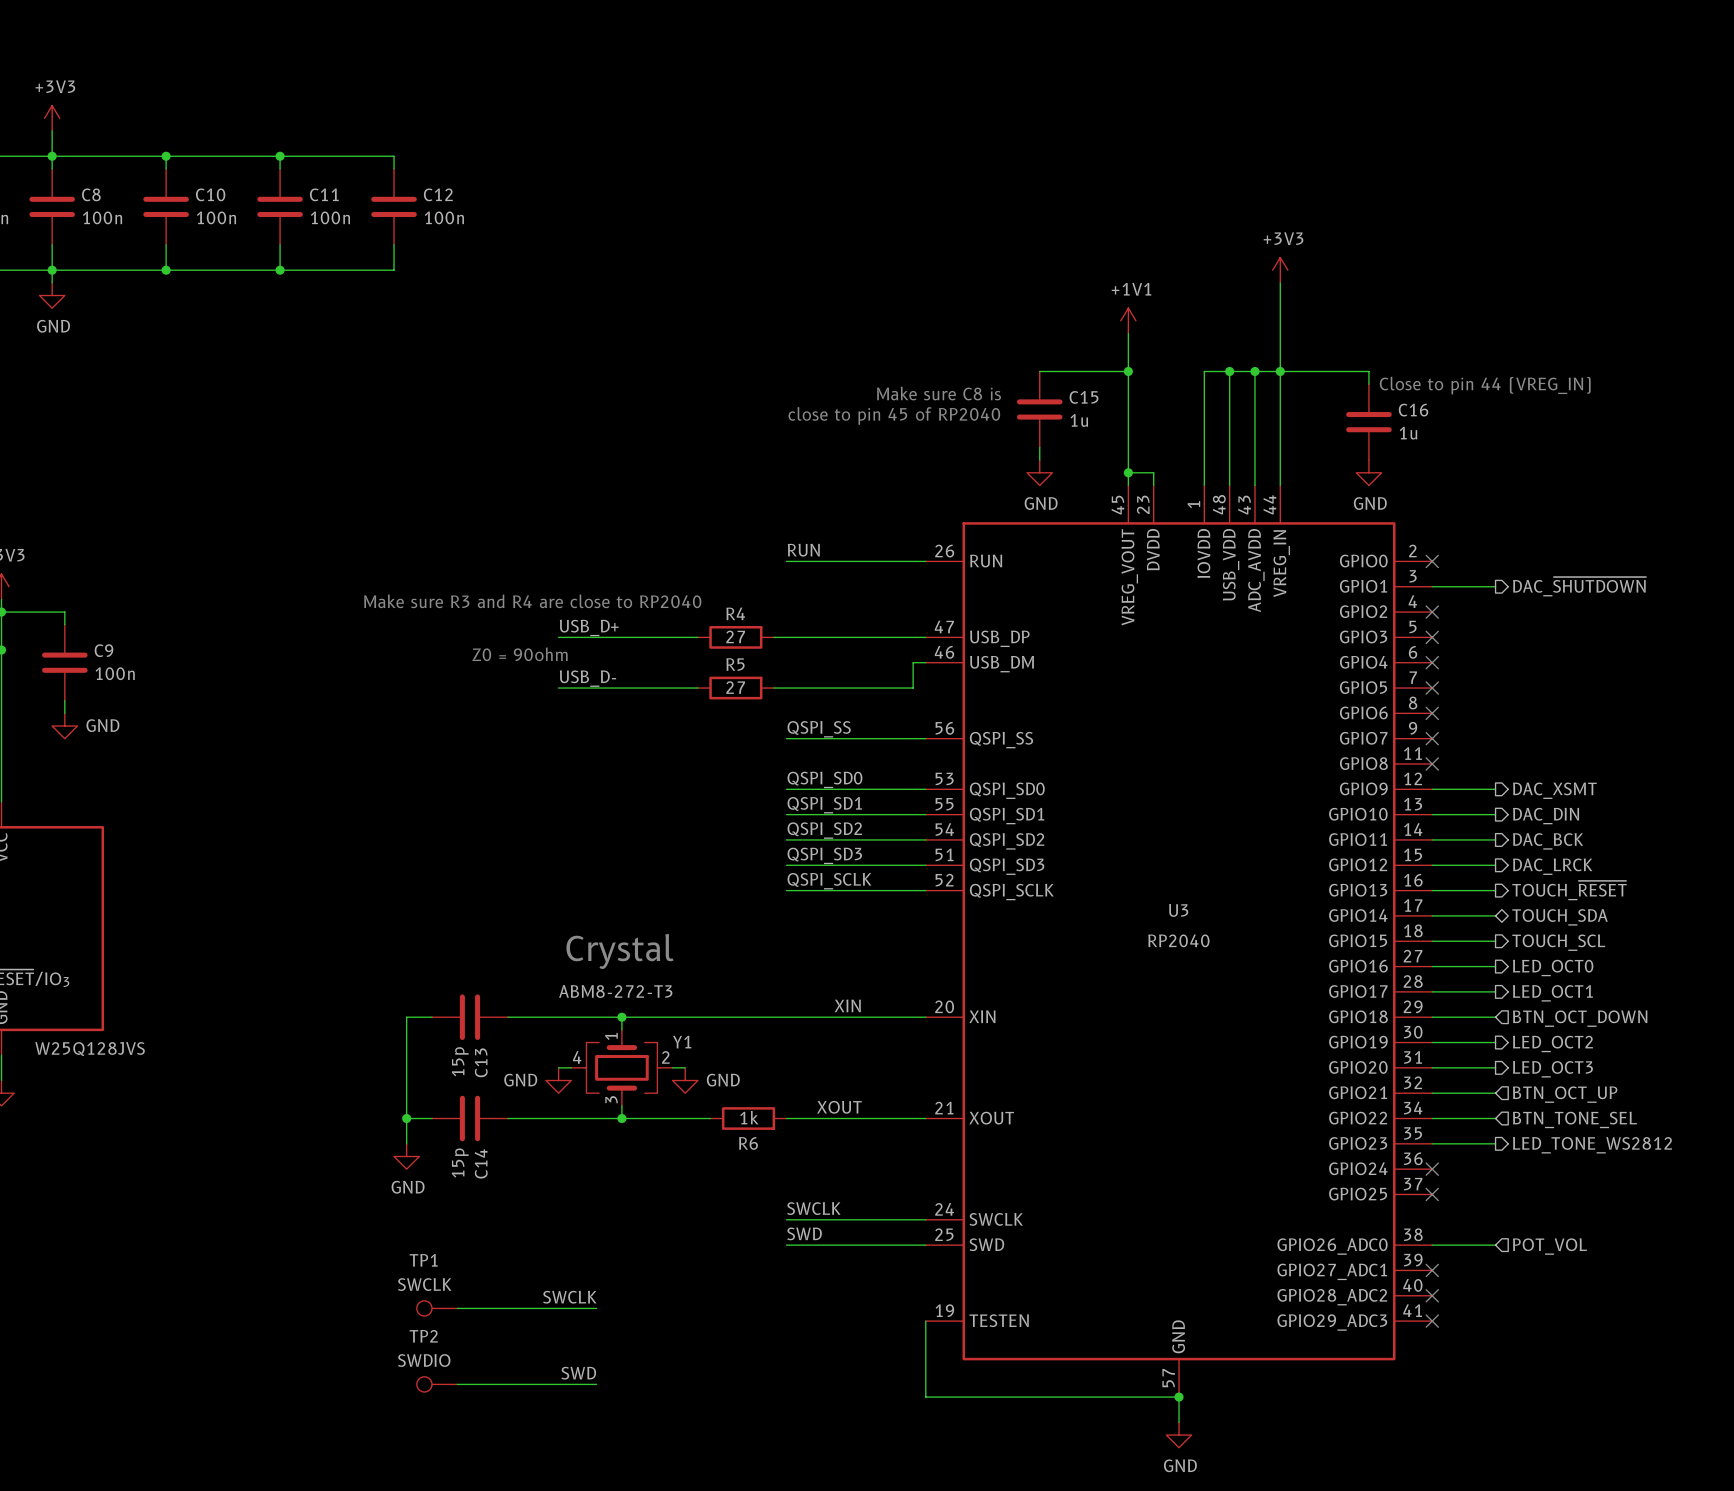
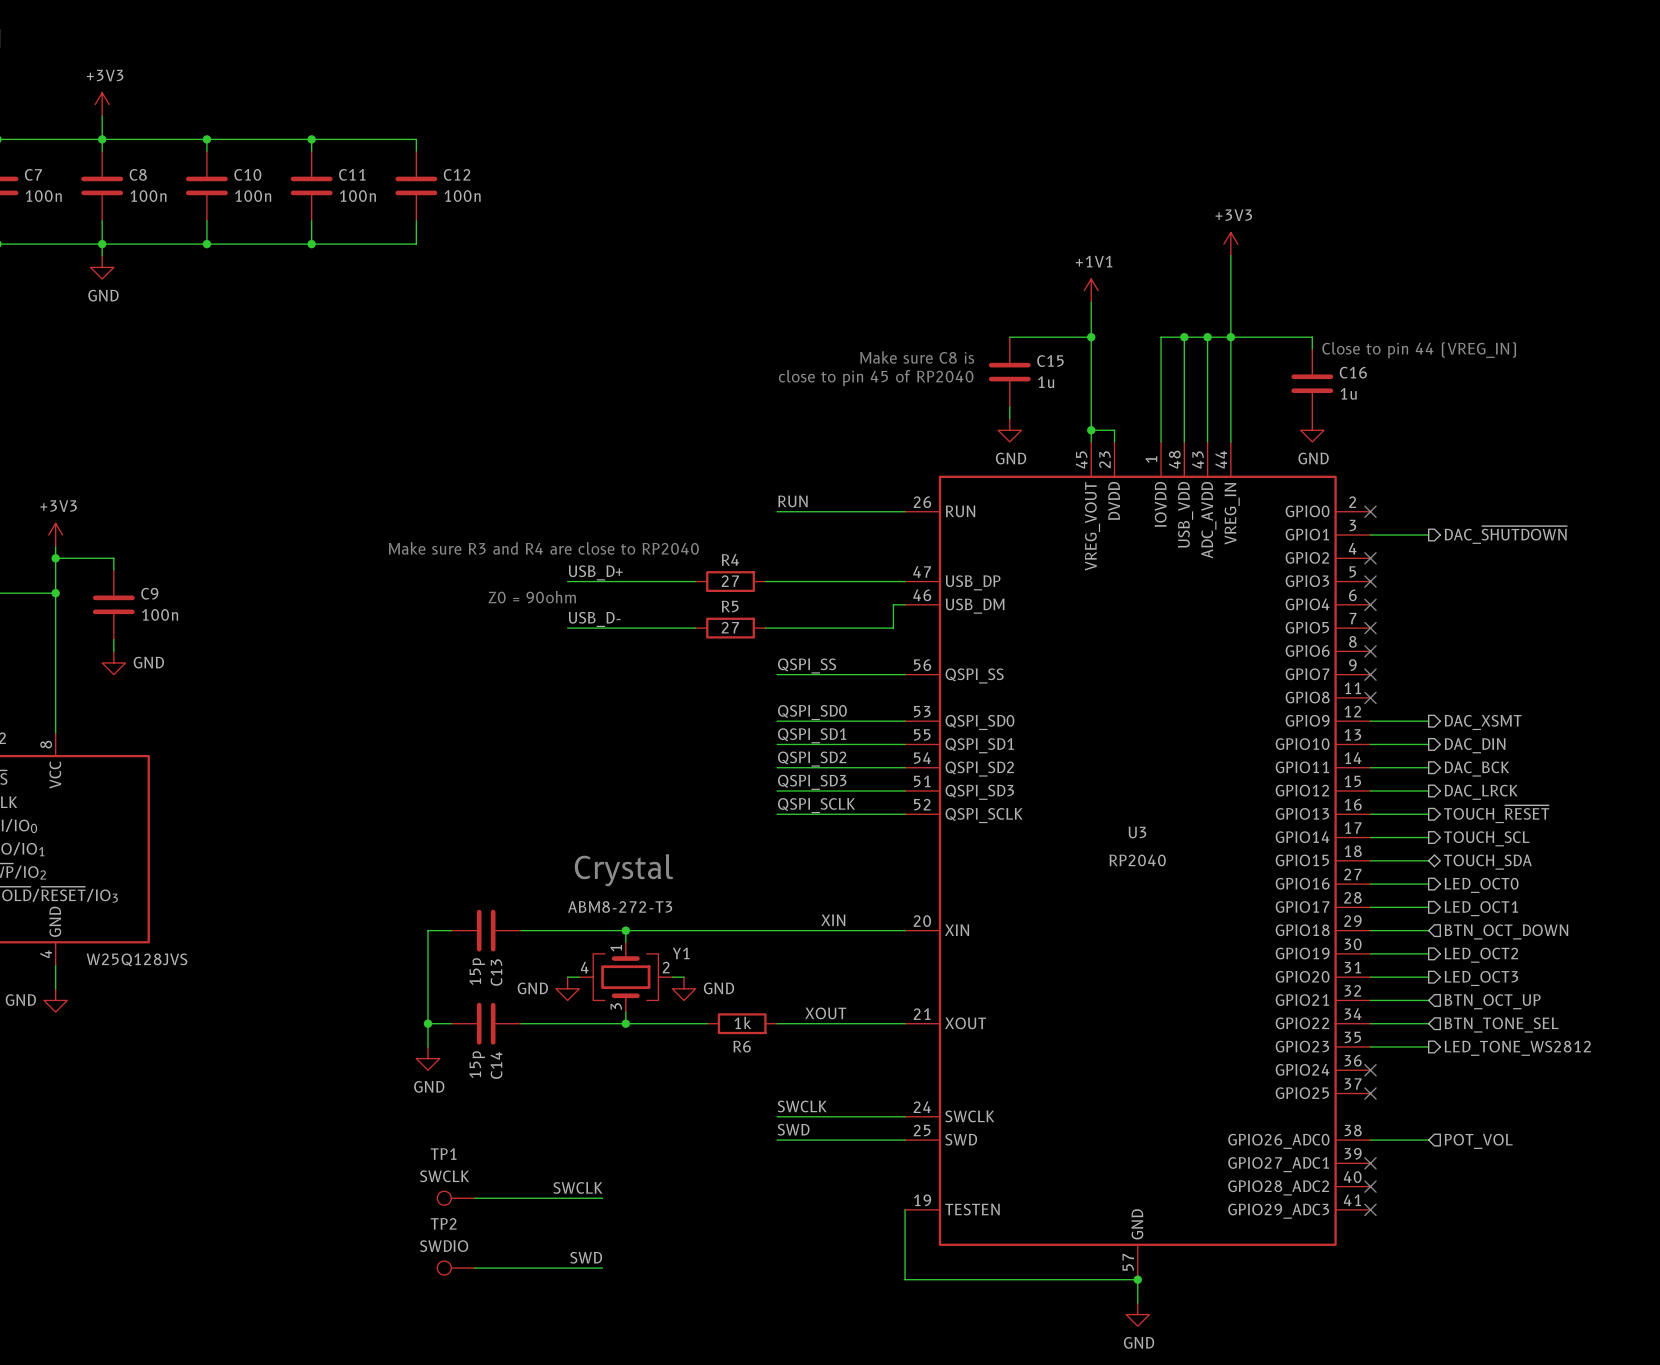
hierarchical label shape: bidirectional (1560, 917) -> output (1486, 838)
hierarchical label: TOUCH_SDA (1560, 917) -> TOUCH_SCL (1486, 838)
hierarchical label shape: output (1558, 942) -> bidirectional (1487, 862)
hierarchical label: TOUCH_SCL (1558, 942) -> TOUCH_SDA (1487, 862)

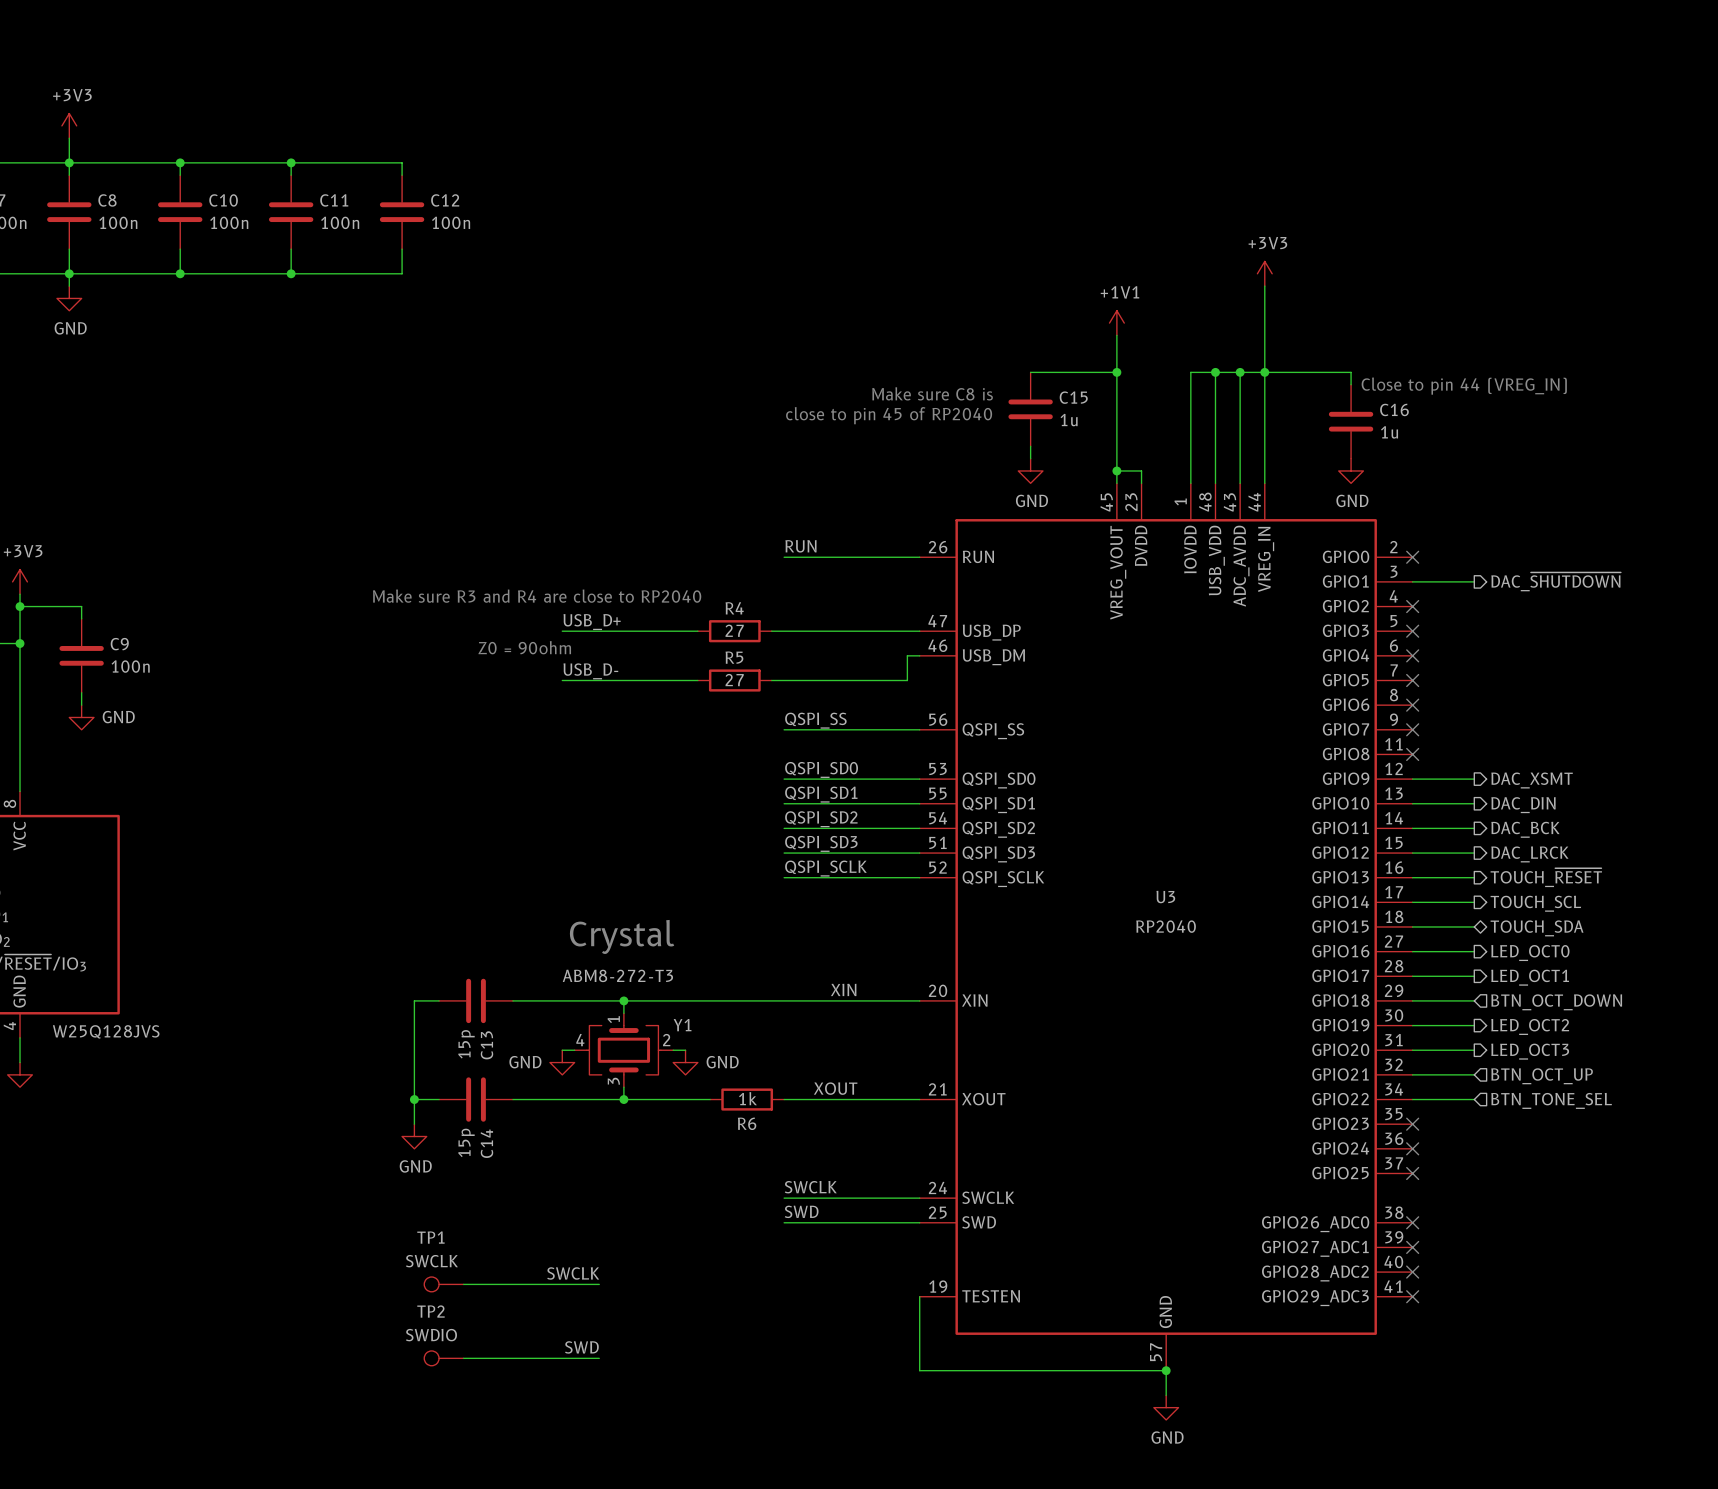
wire: (1370, 1046) (1428, 1046) -> none
no-connect mark: none -> (1412, 1124)
hierarchical label: LED_TONE_WS2812 (1517, 1048) -> none
wire: (1370, 1140) (1428, 1140) -> none
no-connect mark: none -> (1412, 1222)
hierarchical label: POT_VOL (1478, 1141) -> none

